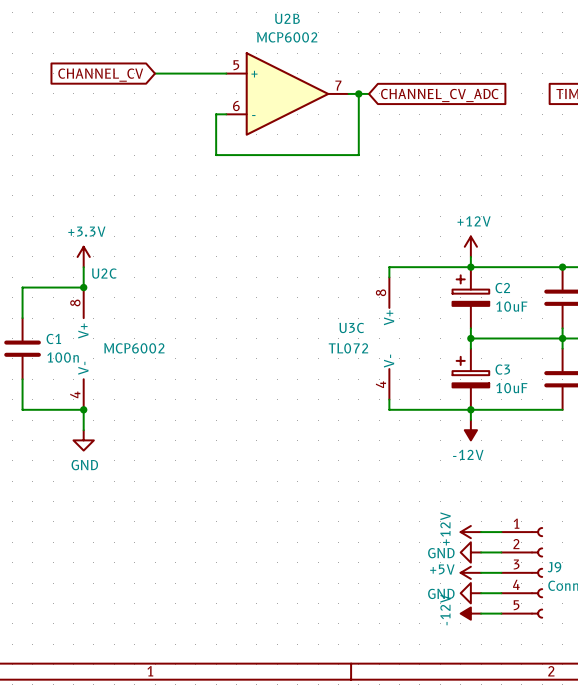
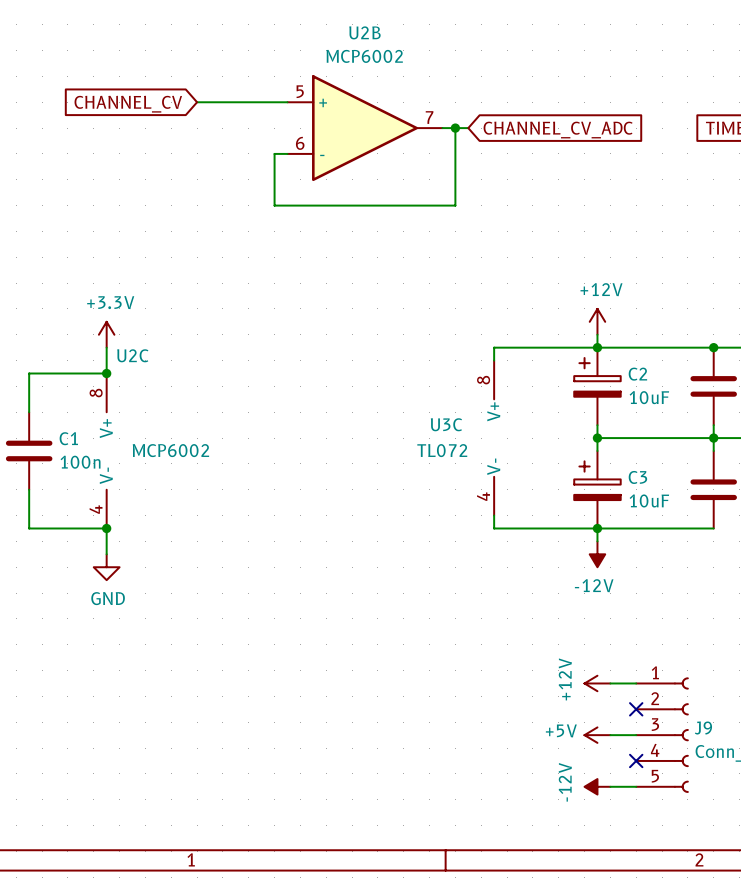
power symbol: GND (470, 552) -> none
wire: (481, 552) (501, 552) -> none
no-connect mark: none -> (636, 709)
power symbol: GND (470, 593) -> none
wire: (481, 593) (501, 593) -> none
no-connect mark: none -> (636, 760)

